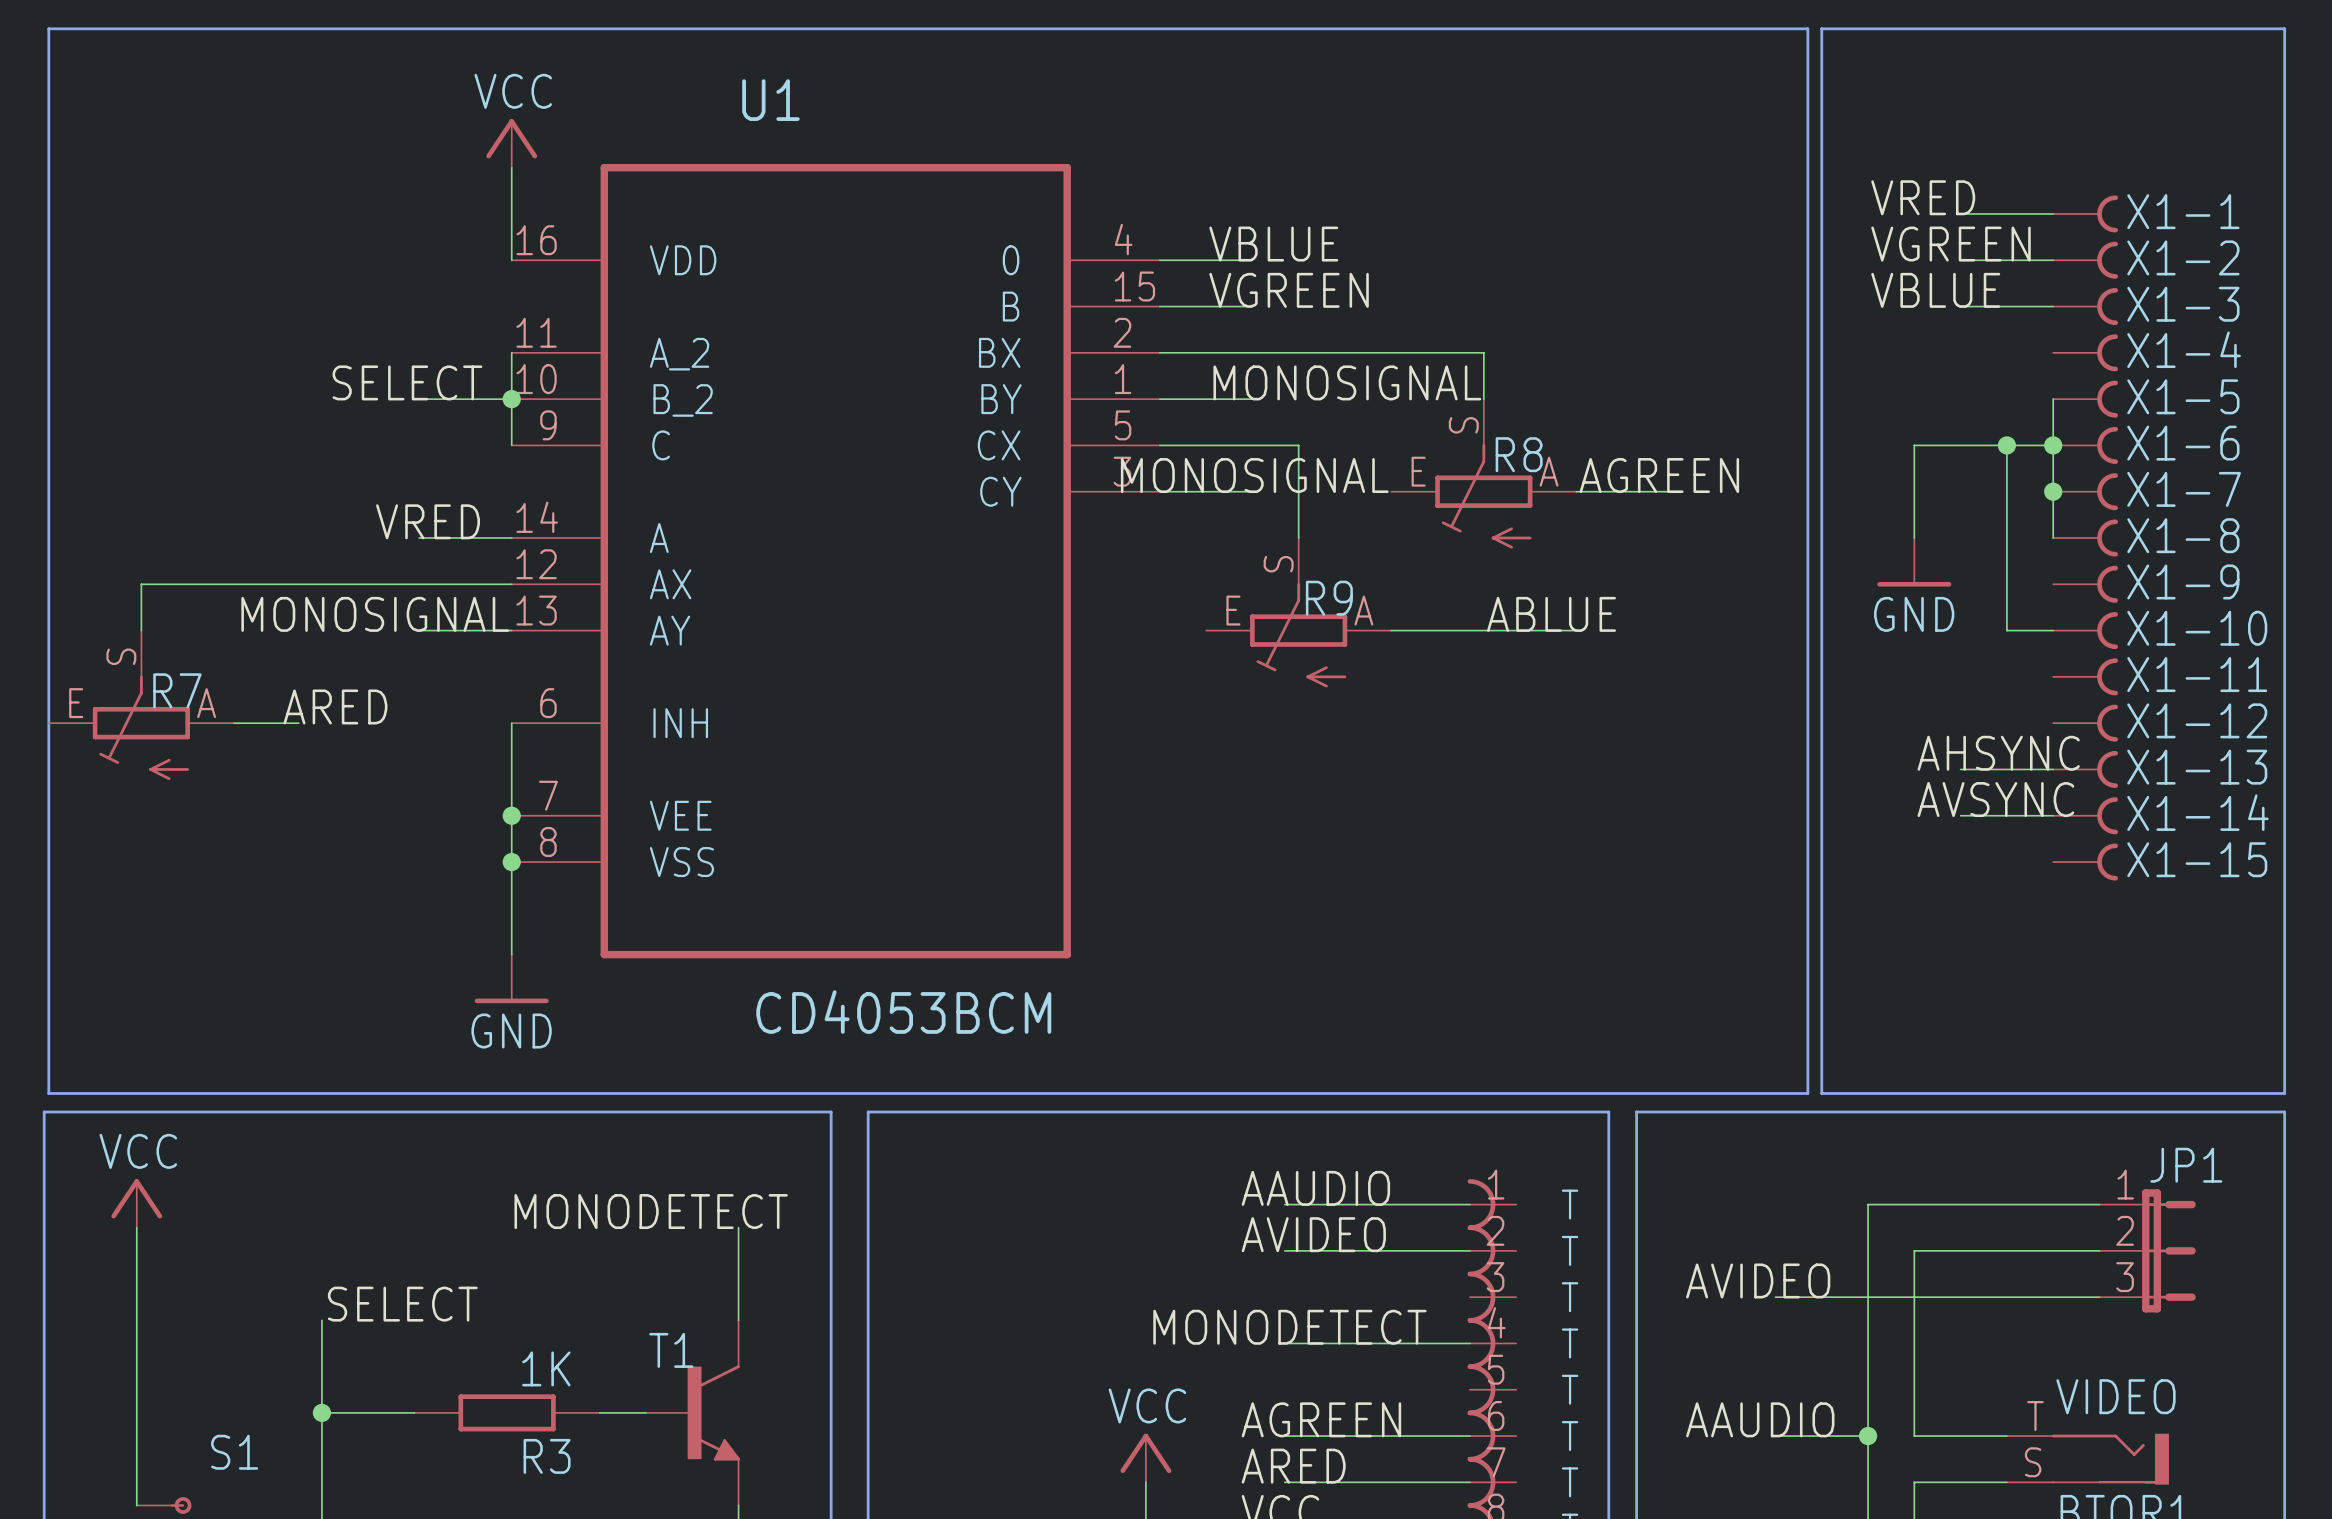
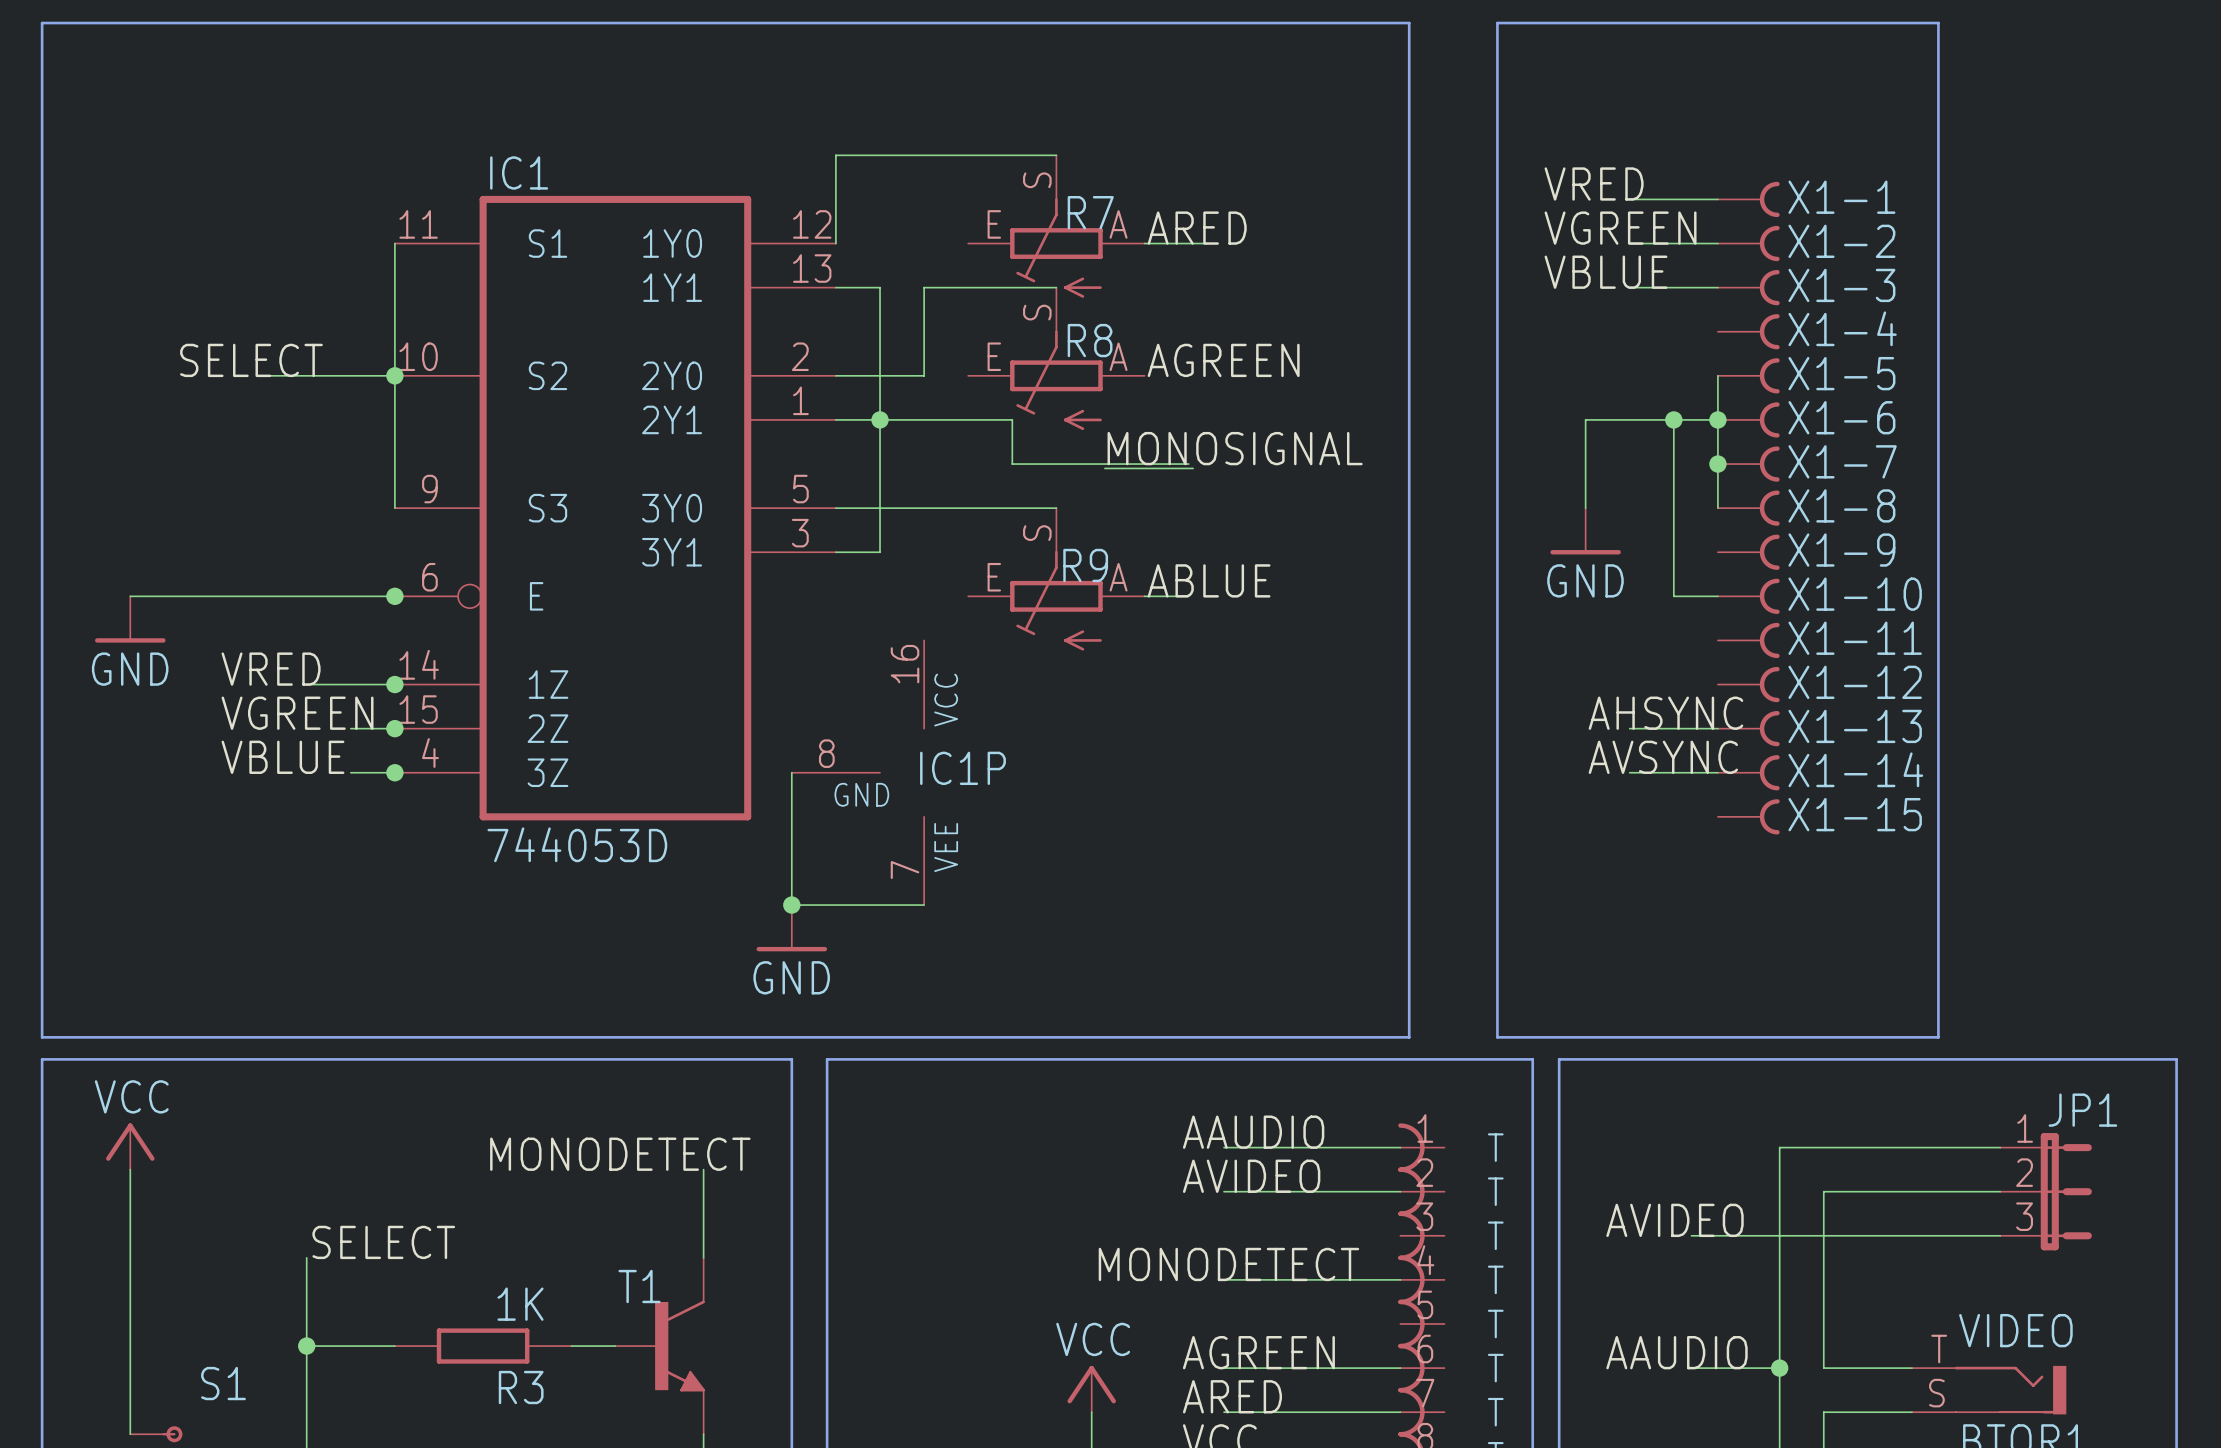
line: (48, 28) (1807, 28) (1807, 1093) (48, 1093) (48, 28) -> (42, 23) (42, 1037) (1409, 1037) (1409, 23) (42, 23)
line: (1821, 28) (1821, 1093) (2284, 1093) (2284, 28) (1821, 28) -> (1497, 23) (1497, 1037) (1938, 1037) (1938, 23) (1497, 23)
power symbol: VCC (511, 143) -> none
wire: none -> (1056, 155) (835, 155) (835, 243)
wire: (511, 167) (511, 260) -> none
label position: VRED (1923, 197) -> VRED (1594, 184)
wire: (1960, 213) (2053, 213) -> (1629, 199) (1717, 199)
X1-1 position: (2085, 213) -> (1748, 199)
label: none -> VGREEN (1620, 228)
label: VBLUE (1273, 244) -> ARED (1197, 228)
label: VGREEN (1950, 244) -> none
wire: none -> (394, 243) (394, 508)
wire: none -> (1144, 243) (1206, 243)
wire: (1159, 260) (1252, 260) -> none
wire: (1960, 260) (2053, 260) -> (1629, 243) (1717, 243)
X1-2 position: (2085, 260) -> (1748, 243)
label: none -> VBLUE (1605, 272)
label: VGREEN (1289, 290) -> none
label: VBLUE (1935, 290) -> none
wire: none -> (835, 287) (880, 287) (880, 552) (835, 552)
wire: none -> (1056, 287) (924, 287) (924, 375) (835, 375)
wire: (1159, 306) (1252, 306) -> none
wire: (1960, 306) (2053, 306) -> (1629, 287) (1717, 287)
X1-3 position: (2085, 306) -> (1748, 287)
wire: (511, 352) (511, 445) -> none
wire: (1159, 352) (1483, 352) (1483, 399) -> none
X1-4 position: (2085, 352) -> (1748, 331)
label position: SELECT (407, 382) -> SELECT (251, 360)
label: MONOSIGNAL (1347, 382) -> none
wire: none -> (262, 375) (394, 375)
wire: (419, 399) (511, 399) -> none
junction position: (511, 399) -> (394, 375)
wire: (1159, 399) (1252, 399) -> none
wire: (2053, 399) (2053, 538) -> (1717, 375) (1717, 508)
X1-5 position: (2085, 399) -> (1748, 375)
wire: none -> (835, 419) (1012, 419) (1012, 464) (1188, 464)
junction: none -> (880, 419)
junction: none -> (1673, 419)
junction: none -> (1717, 419)
wire: (1159, 445) (1298, 445) (1298, 538) -> none
wire: (2006, 445) (2006, 630) (2053, 630) -> (1673, 419) (1673, 596) (1717, 596)
junction: (2006, 445) -> none
wire: (2053, 445) (1914, 445) (1914, 538) -> (1717, 419) (1585, 419) (1585, 508)
junction: (2053, 445) -> none
X1-6 position: (2085, 445) -> (1748, 419)
R8 position: (1483, 473) -> (1056, 358)
label position: MONOSIGNAL (1254, 475) -> MONOSIGNAL (1235, 448)
label position: AGREEN (1659, 475) -> AGREEN (1223, 360)
junction: none -> (1717, 464)
wire: (1576, 491) (1668, 491) -> none
junction: (2053, 491) -> none
X1-7 position: (2085, 491) -> (1748, 464)
label position: VRED (428, 521) -> VRED (271, 669)
IC1: none -> 744053D (615, 508)
wire: none -> (835, 508) (1056, 508)
wire: (419, 538) (511, 538) -> none
X1-8 position: (2085, 538) -> (1748, 508)
U1: CD4053BCM (835, 561) -> none
power symbol position: GND (1914, 562) -> GND (1585, 531)
wire: (511, 584) (141, 584) (141, 630) -> none
X1-9 position: (2085, 584) -> (1748, 552)
R9 position: (1298, 612) -> (1056, 579)
label: MONOSIGNAL (375, 614) -> none
label position: ABLUE (1551, 614) -> ABLUE (1209, 580)
wire: none -> (130, 596) (394, 596)
junction: none -> (394, 596)
wire: none -> (1144, 596) (1188, 596)
wire: (419, 630) (511, 630) -> (306, 684) (394, 684)
wire: (1391, 630) (1576, 630) -> none
X1-10 position: (2085, 630) -> (1748, 596)
power symbol: none -> GND (130, 619)
X1-11 position: (2085, 676) -> (1748, 640)
R7 position: (141, 705) -> (1056, 226)
label: ARED (335, 706) -> none
junction: none -> (394, 684)
wire: (233, 723) (298, 723) -> none
wire: (511, 723) (511, 954) -> none
X1-12 position: (2085, 723) -> (1748, 684)
label: none -> VGREEN (297, 713)
label position: AHSYNC (1998, 753) -> AHSYNC (1665, 713)
wire: none -> (350, 728) (394, 728)
junction: none -> (394, 728)
wire: (1960, 769) (2053, 769) -> (1629, 728) (1717, 728)
X1-13 position: (2085, 769) -> (1748, 728)
label: none -> VBLUE (282, 757)
label position: AVSYNC (1995, 799) -> AVSYNC (1663, 757)
wire: none -> (350, 772) (394, 772)
junction: none -> (394, 772)
wire: none -> (791, 772) (791, 905) (924, 905)
IC1P: none -> (857, 772)
junction: (511, 815) -> none
wire: (1960, 815) (2053, 815) -> (1629, 772) (1717, 772)
X1-14 position: (2085, 815) -> (1748, 772)
junction: (511, 862) -> none
X1-15 position: (2085, 862) -> (1748, 816)
junction: none -> (791, 905)
power symbol: none -> GND (791, 928)
power symbol: GND (511, 978) -> none

